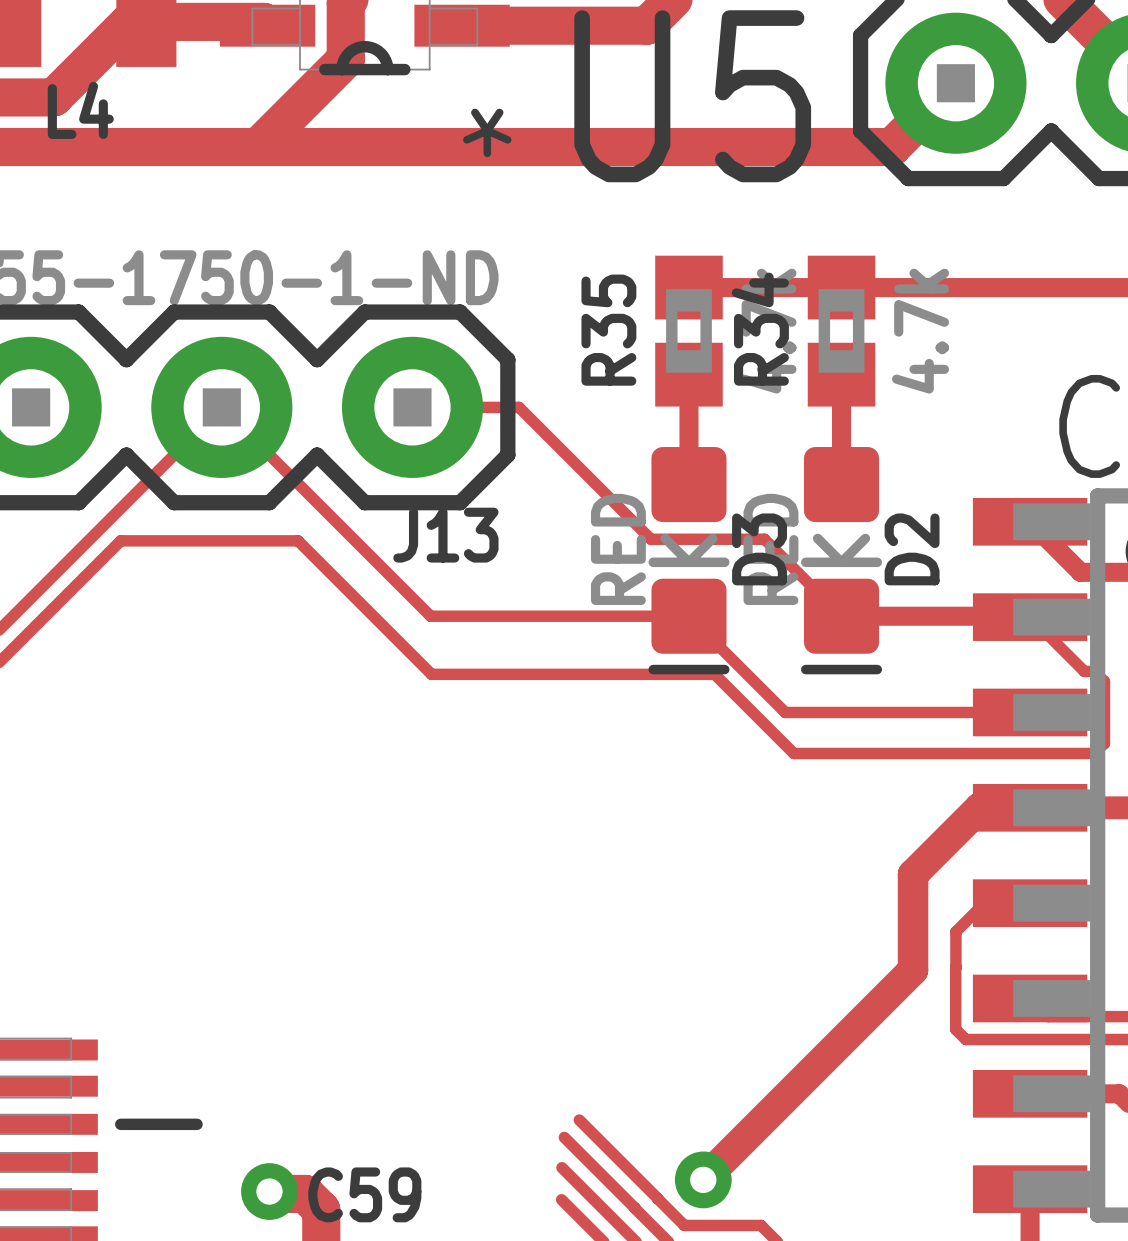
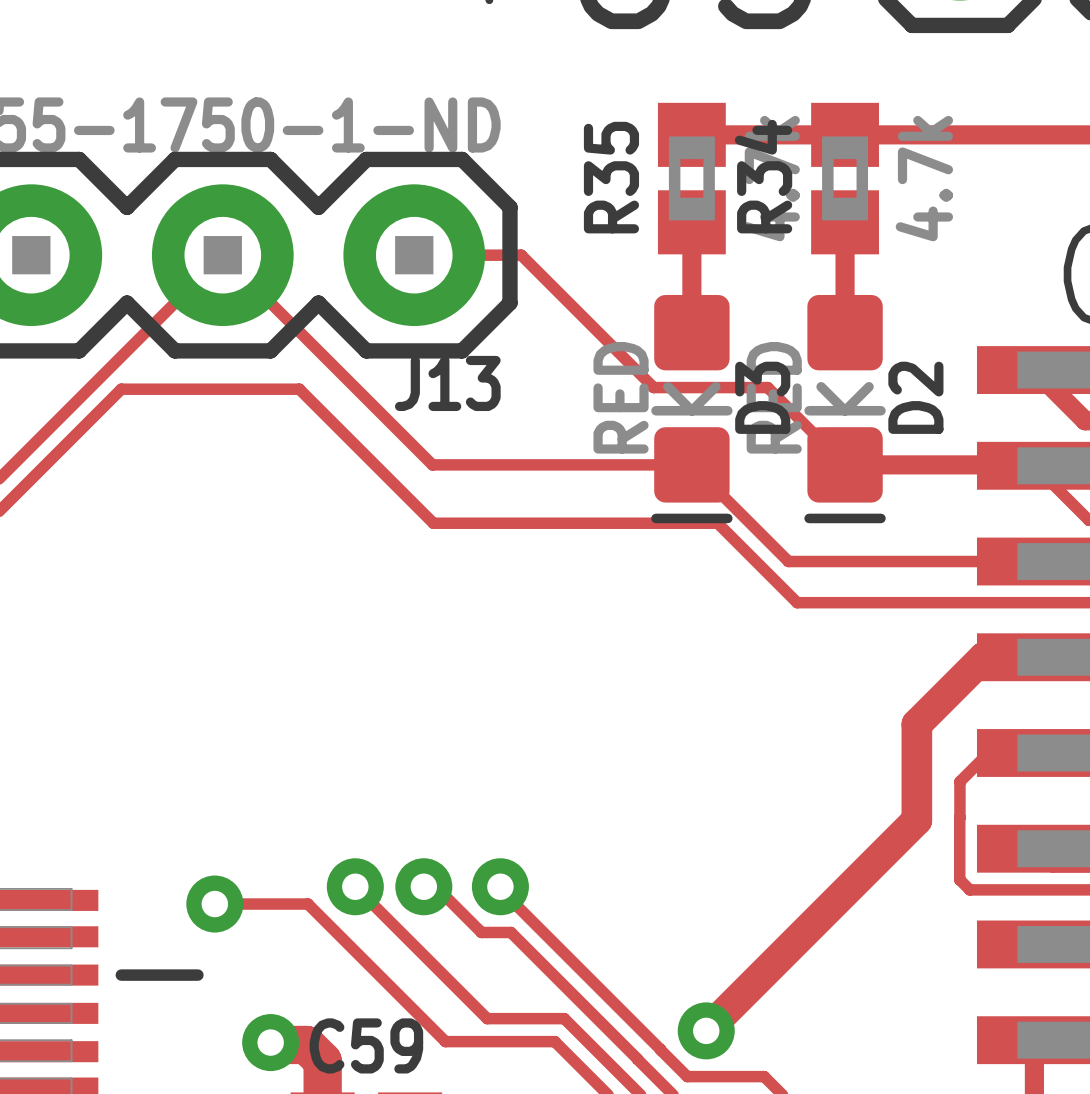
track: none -> (355, 886) (487, 1018) (564, 1018)
via: none -> (355, 886)
track: none -> (423, 886) (435, 886) (481, 932) (511, 932) (566, 988)
via: none -> (423, 886)
track: none -> (500, 886) (500, 889) (581, 970)
via: none -> (500, 886)
track: none -> (214, 904) (307, 904) (445, 1041) (554, 1041) (563, 1050)
via: none -> (214, 904)

